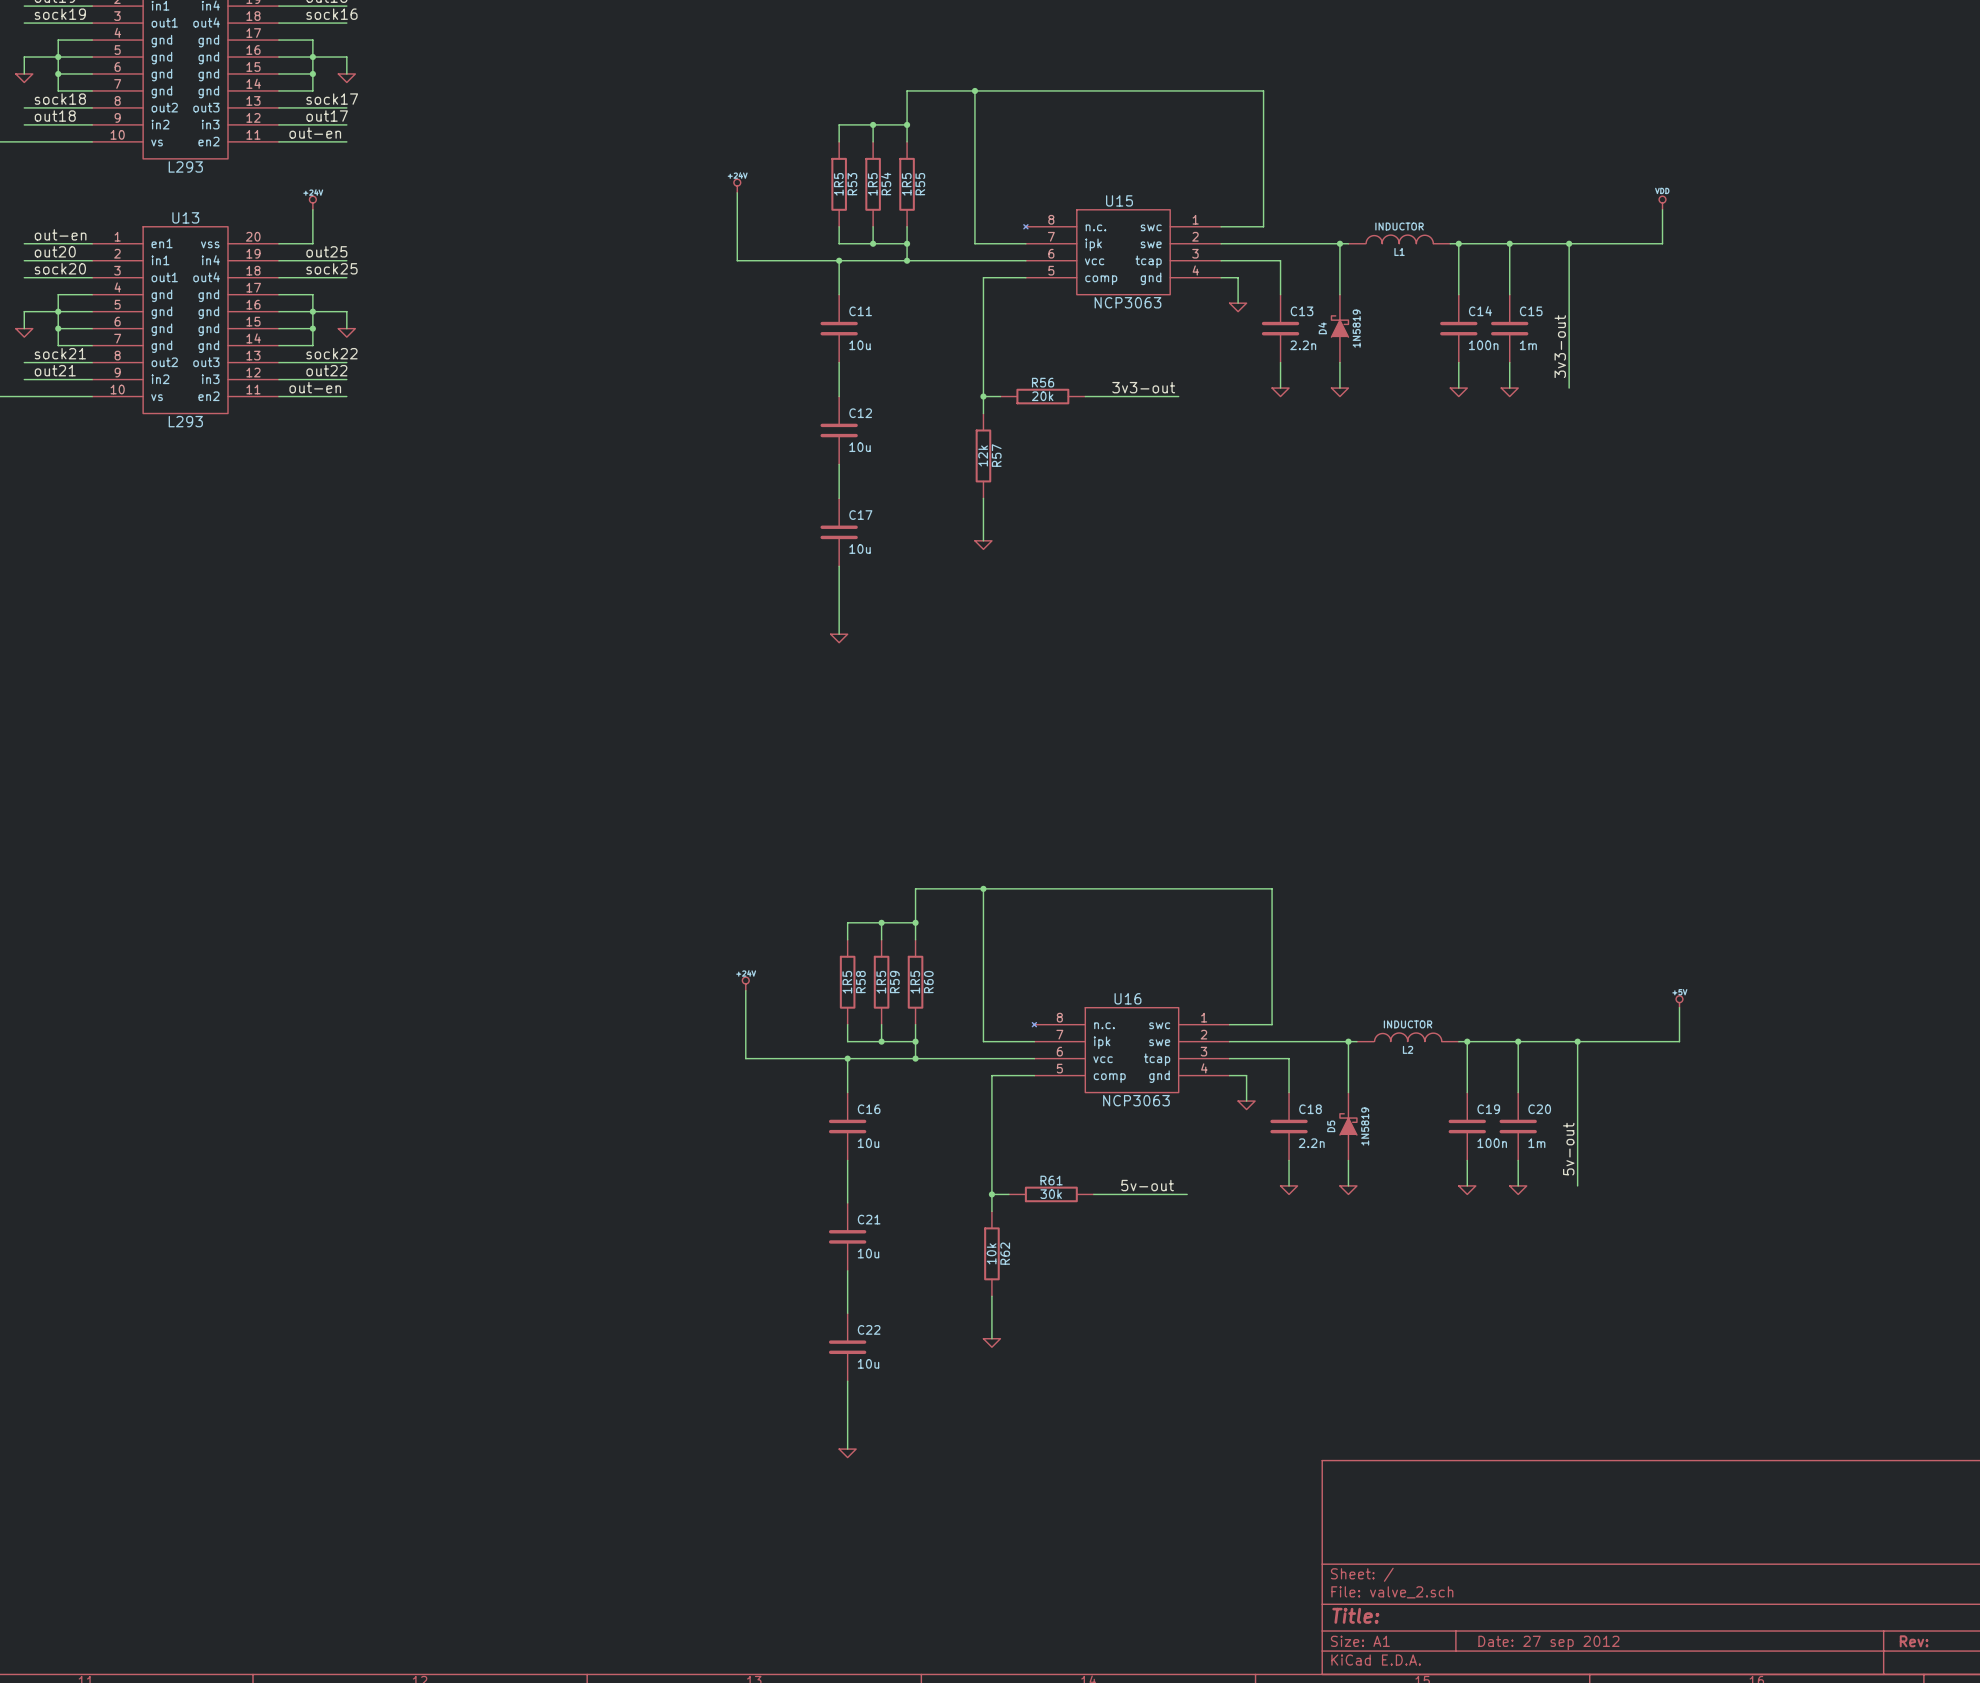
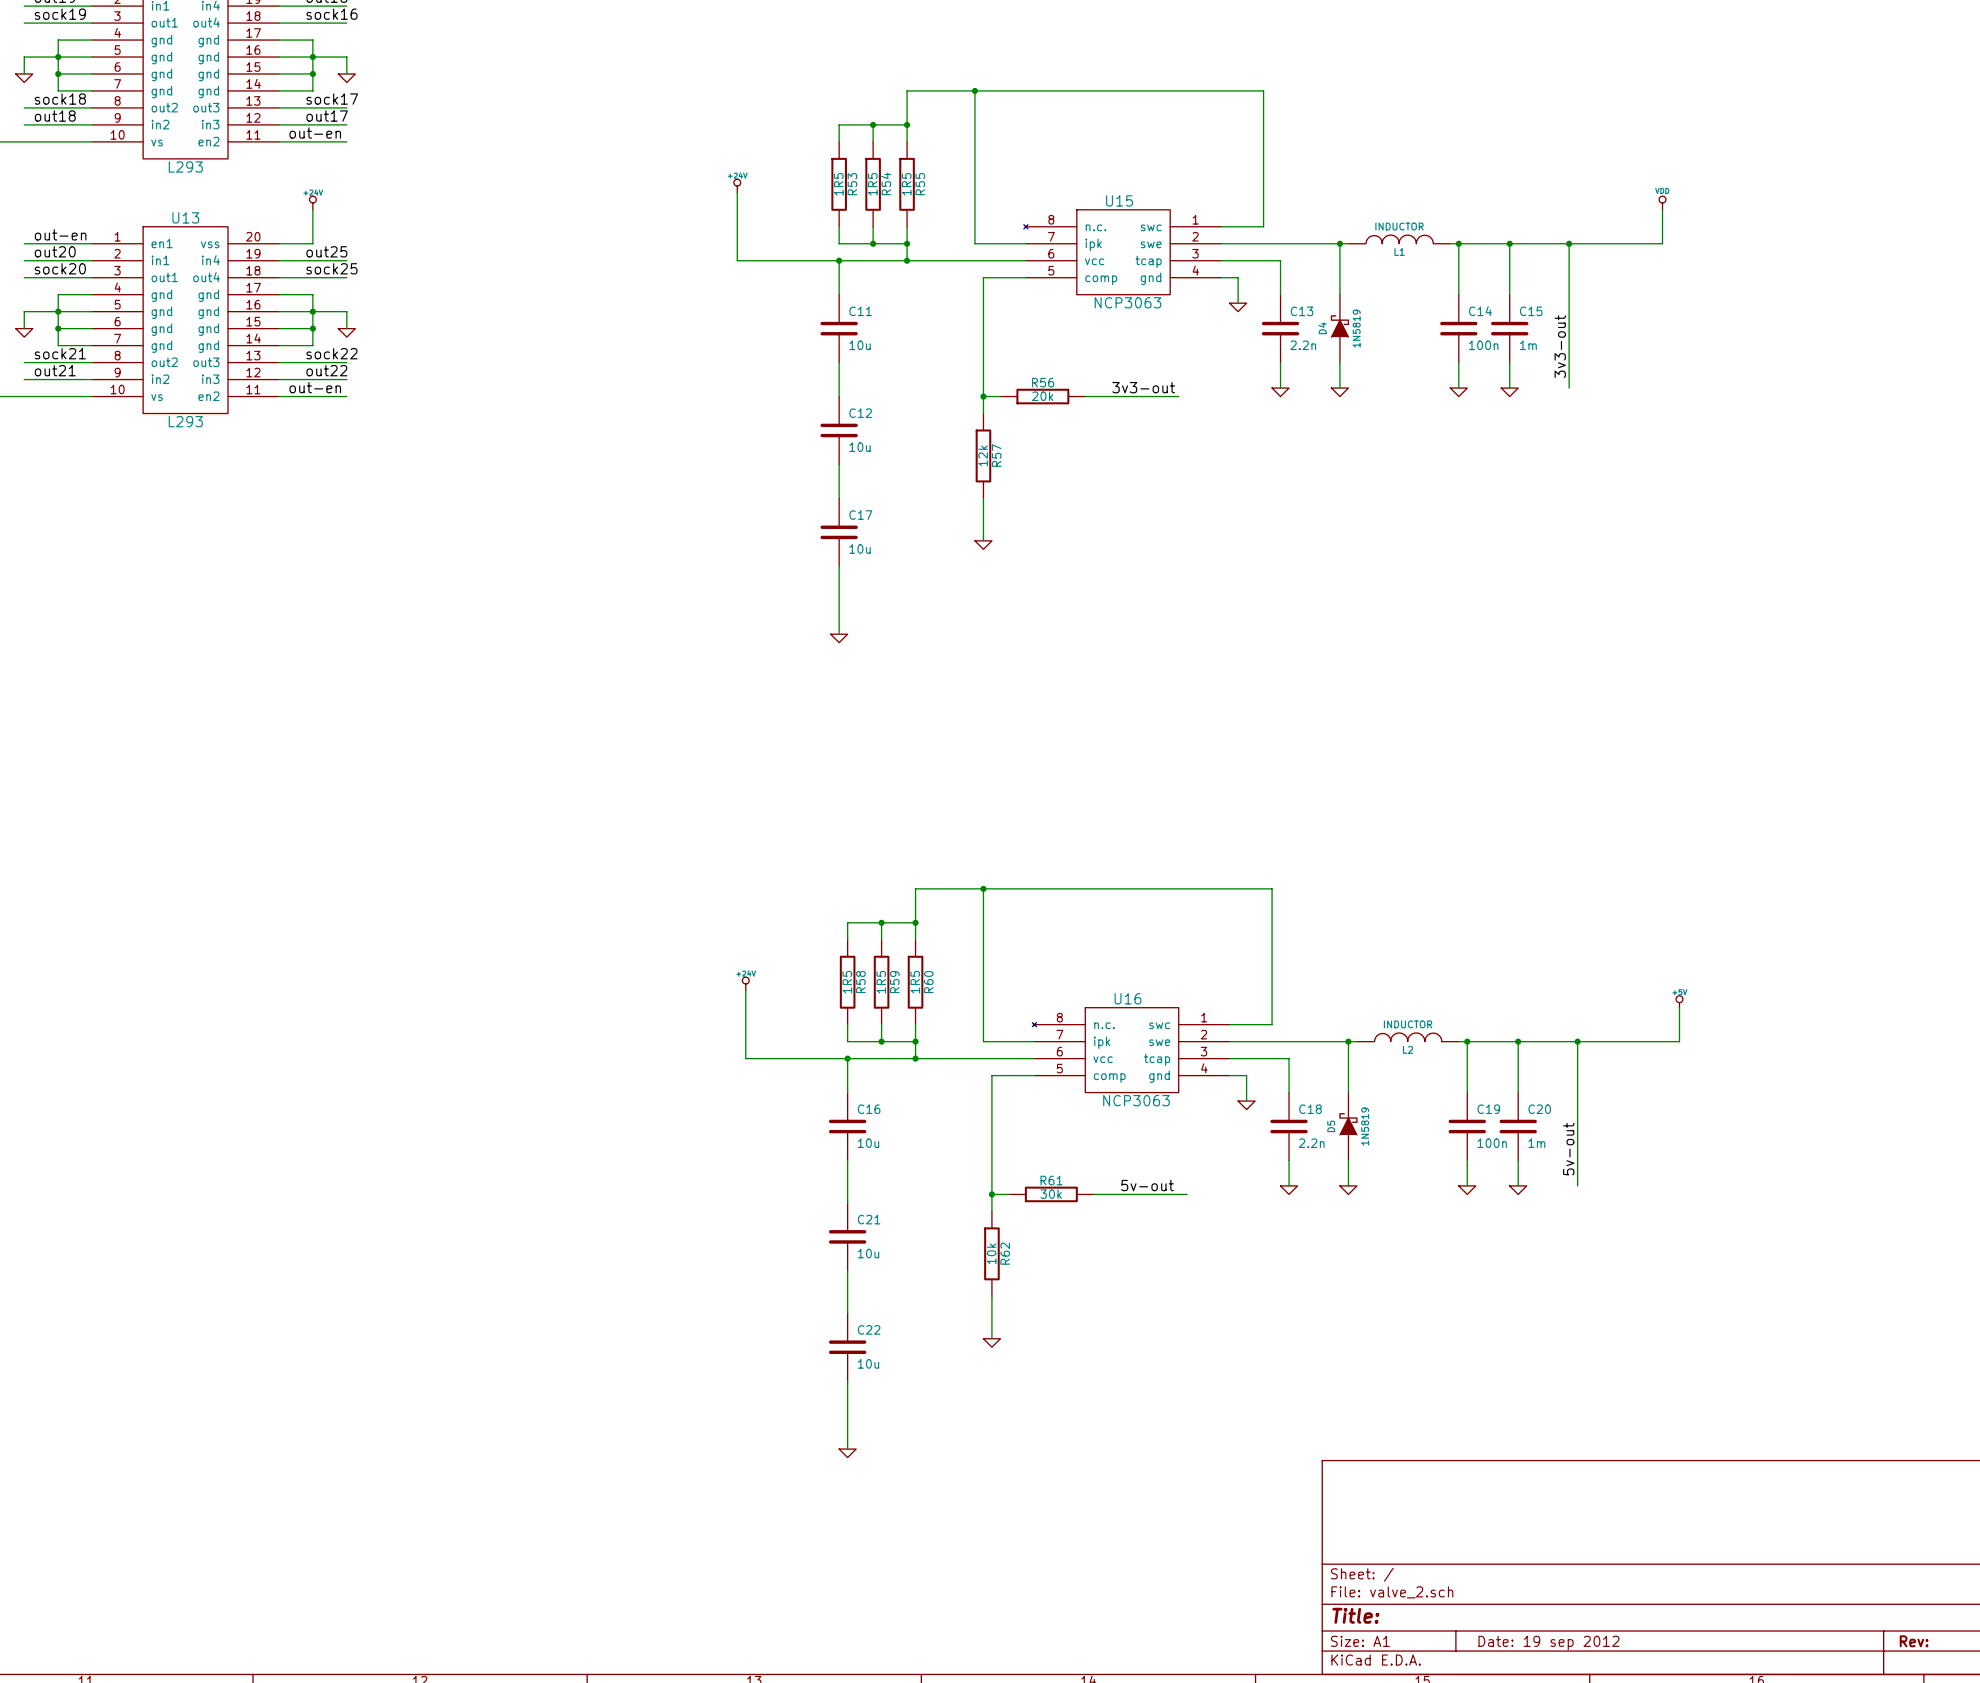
title block: Date: 27 sep 2012 (1548, 1643) -> Date: 19 sep 2012 (1548, 1643)

